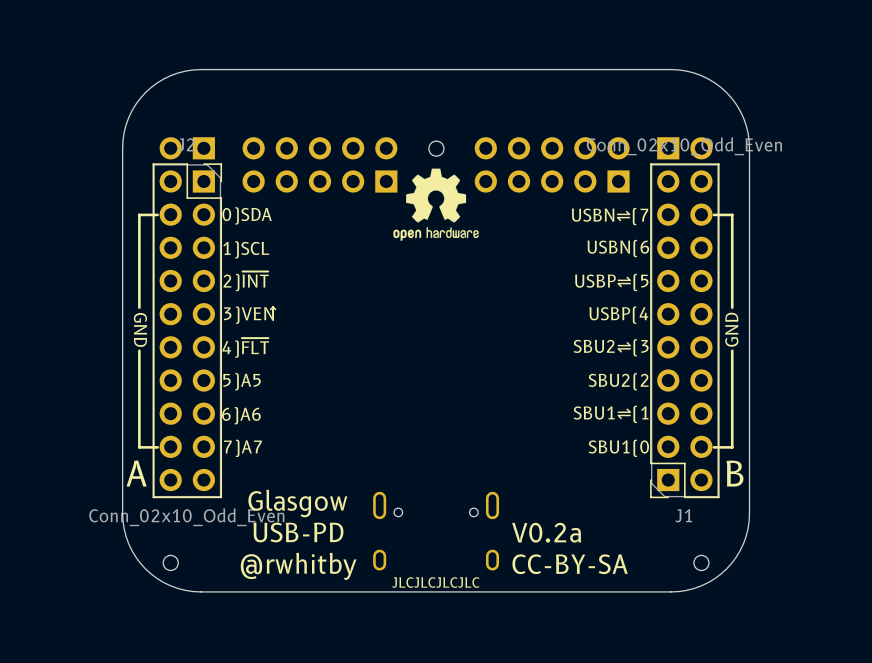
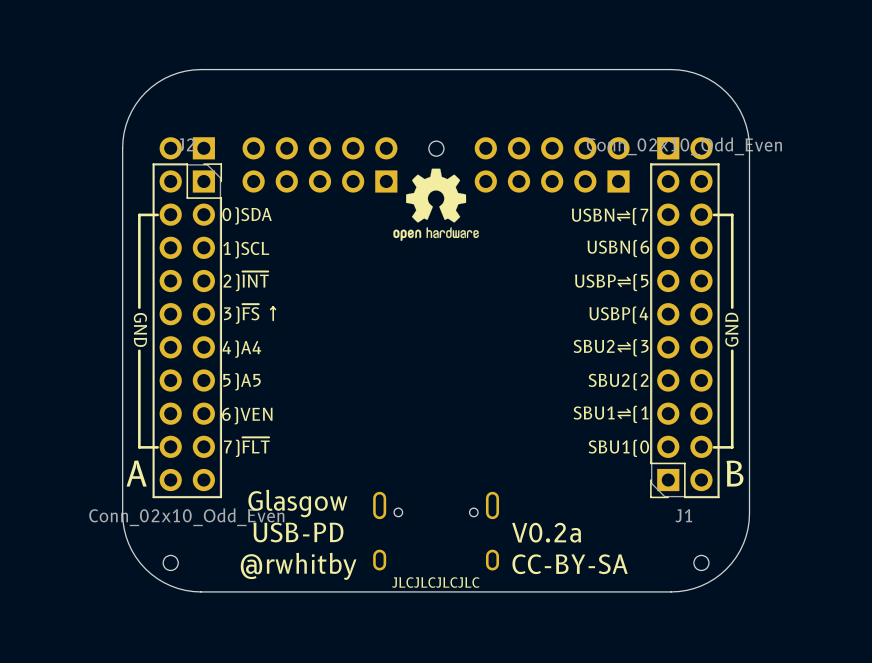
text: 3)VEN (248, 315) -> 3)~{FS} (241, 313)
text: 4)~{FLT} (245, 347) -> 4)A4 (241, 349)
text: 6)A6 (241, 415) -> 6)VEN (247, 415)
text: 7)A7 (242, 448) -> 7)~{FLT} (246, 447)

